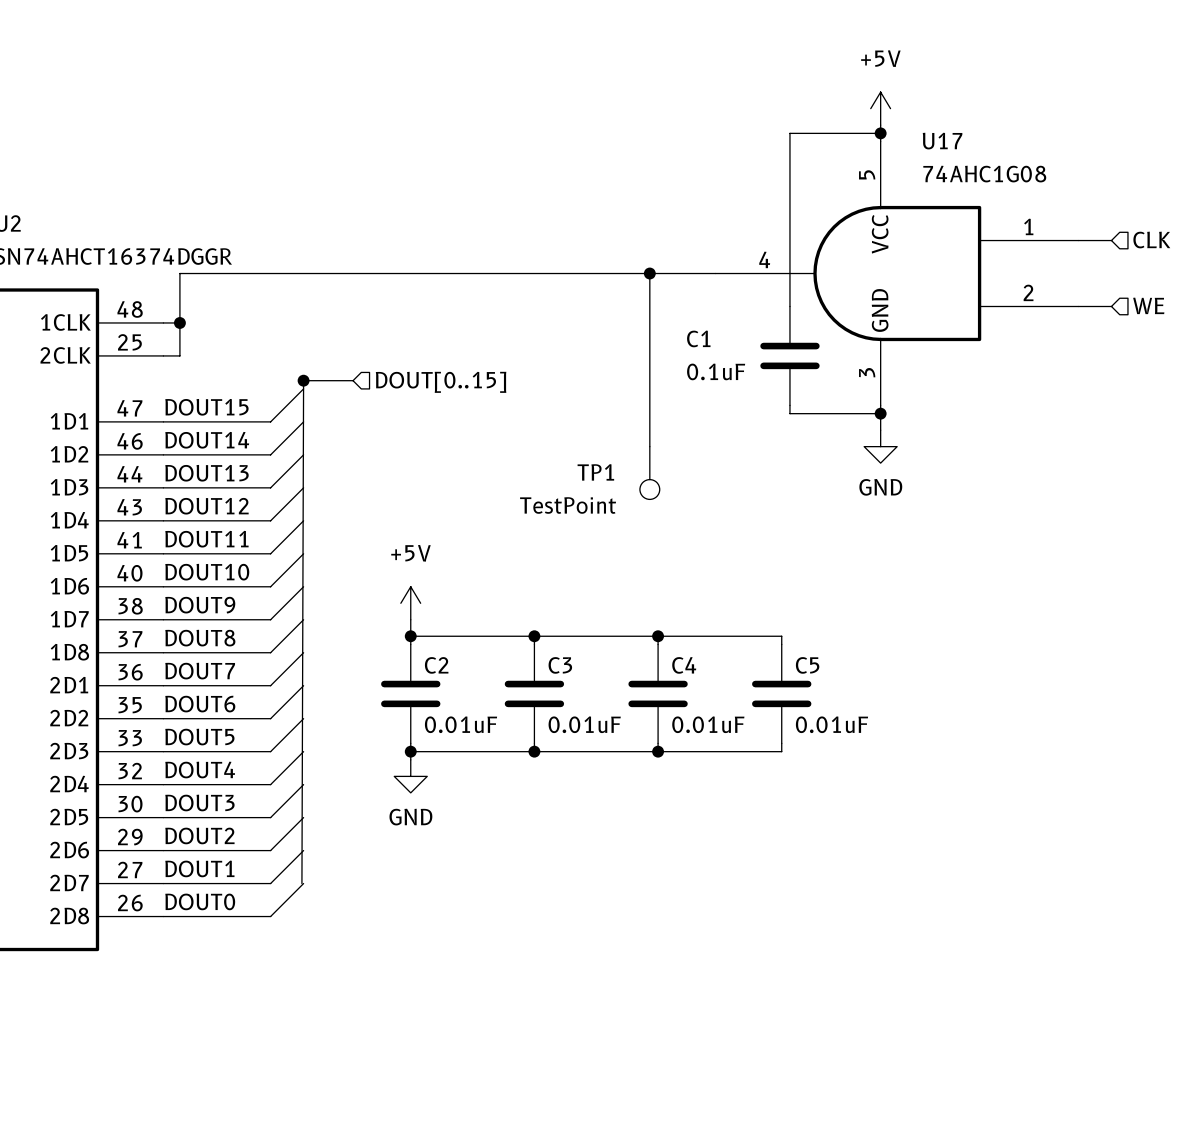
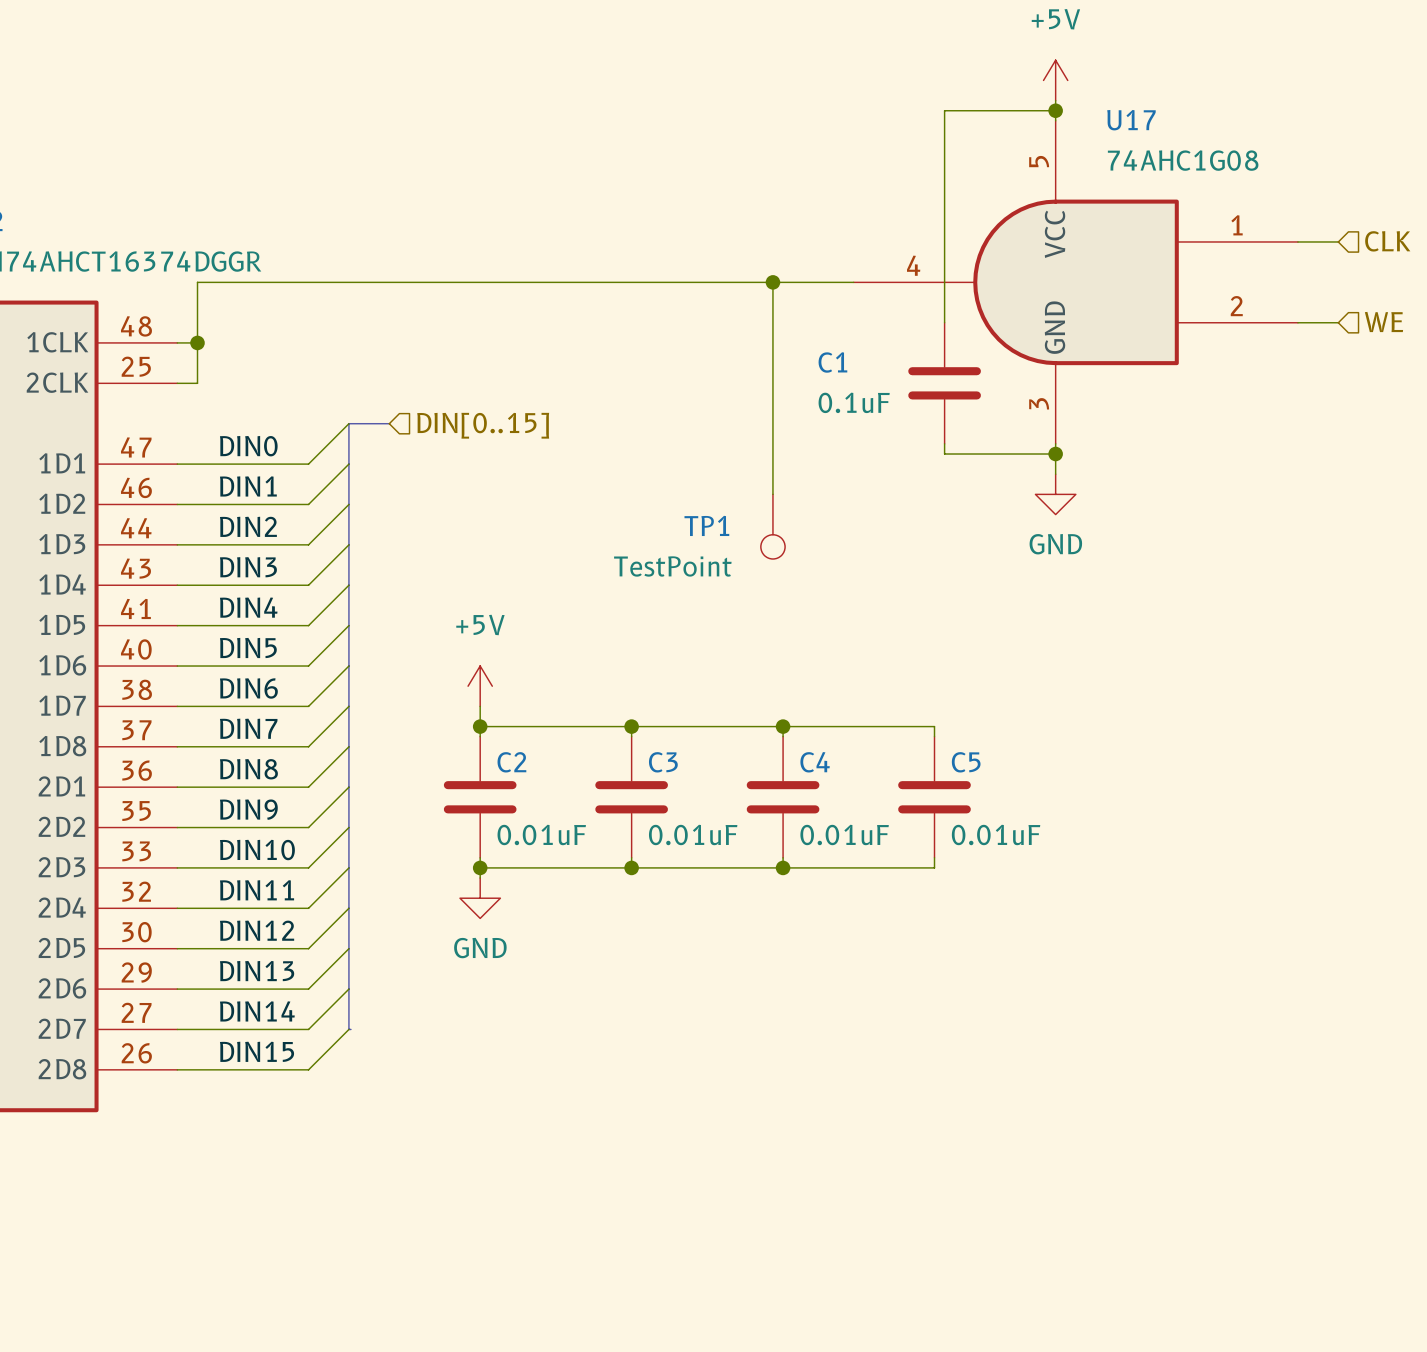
bus: (301, 380) (353, 380) -> none
bus: (303, 380) (301, 883) -> none
junction: (303, 380) -> none
hierarchical label: DOUT[0..15] (441, 382) -> DIN[0..15] (483, 425)
bus: none -> (389, 423) (348, 423) (348, 1029) (350, 1029)
label: DOUT15 (206, 407) -> none
label: none -> DIN0 (248, 446)
label: DOUT14 (207, 440) -> none
label: none -> DIN1 (248, 486)
label: DOUT13 (206, 473) -> none
label: none -> DIN2 (248, 526)
label: DOUT12 (206, 506) -> none
label: none -> DIN3 (248, 567)
label: DOUT11 (206, 539) -> none
label: none -> DIN4 (248, 607)
label: DOUT10 (207, 572) -> none
label: none -> DIN5 (248, 647)
label: DOUT9 (200, 605) -> none
label: none -> DIN6 (248, 688)
label: DOUT8 (200, 638) -> none
label: none -> DIN7 (248, 728)
label: DOUT7 (200, 671) -> none
label: none -> DIN8 (248, 769)
label: DOUT6 (200, 704) -> none
label: none -> DIN9 (248, 809)
label: DOUT5 (199, 737) -> none
label: none -> DIN10 (257, 850)
label: none -> DIN11 (257, 890)
label: DOUT4 (200, 770) -> none
label: DOUT3 (199, 802) -> none
label: none -> DIN12 (257, 930)
label: DOUT2 (199, 835) -> none
label: none -> DIN13 (257, 971)
label: DOUT1 (199, 868) -> none
label: none -> DIN14 (257, 1011)
label: DOUT0 (200, 901) -> none
label: none -> DIN15 (257, 1051)

